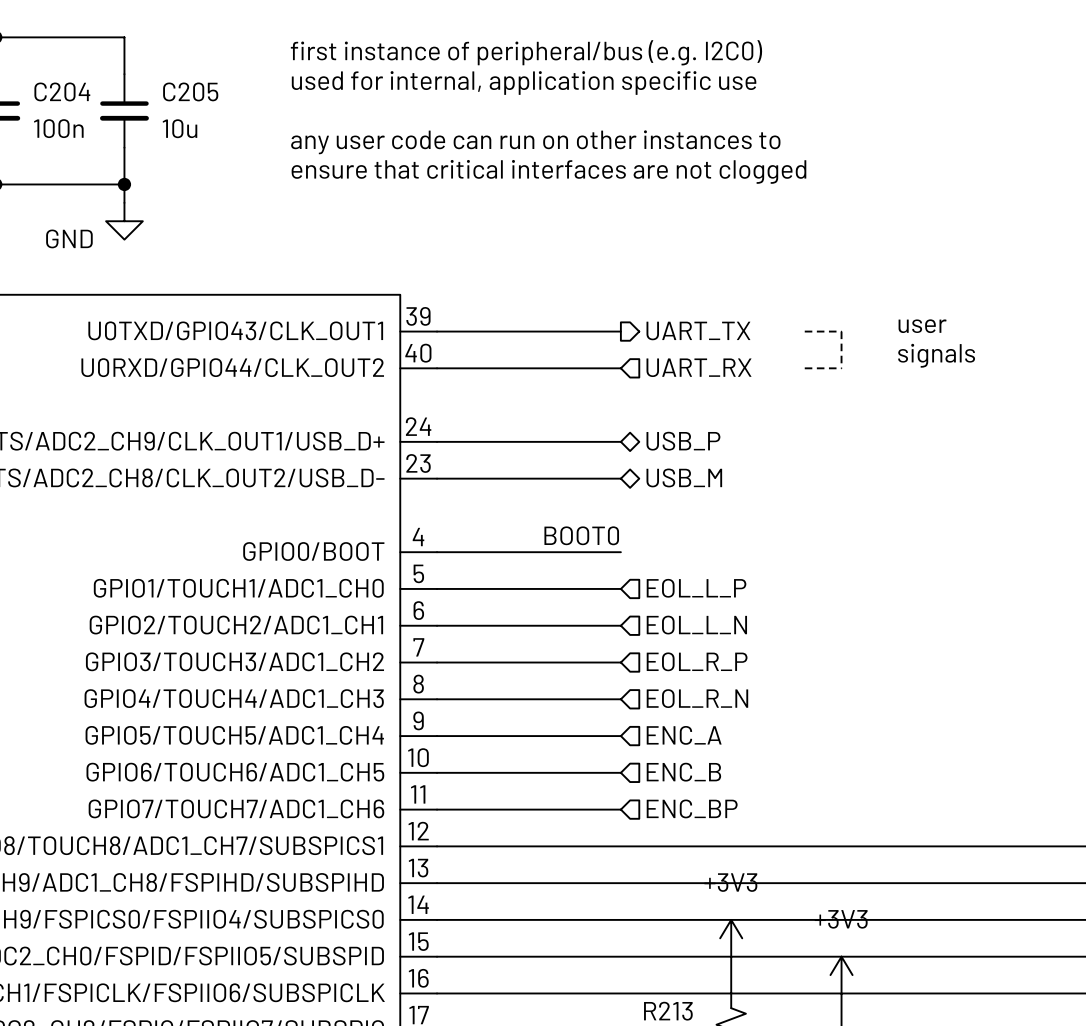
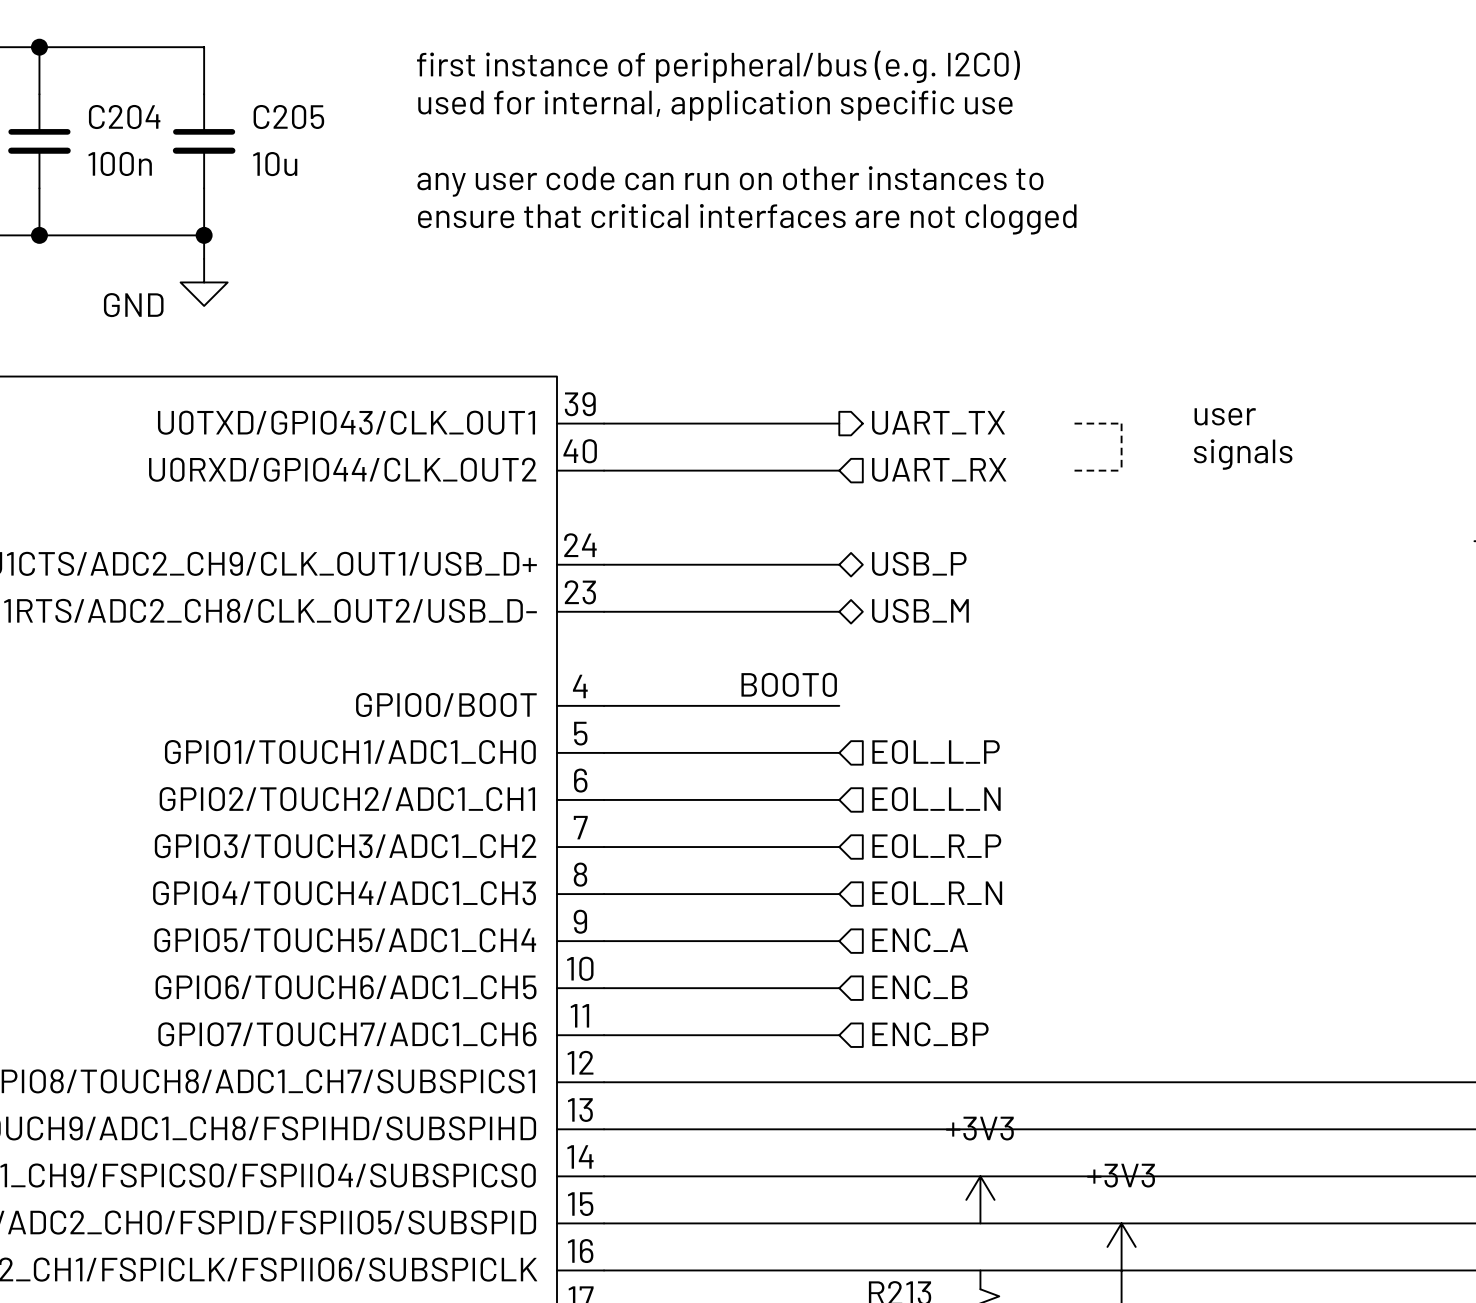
wire: (731, 956) (731, 993) -> none

